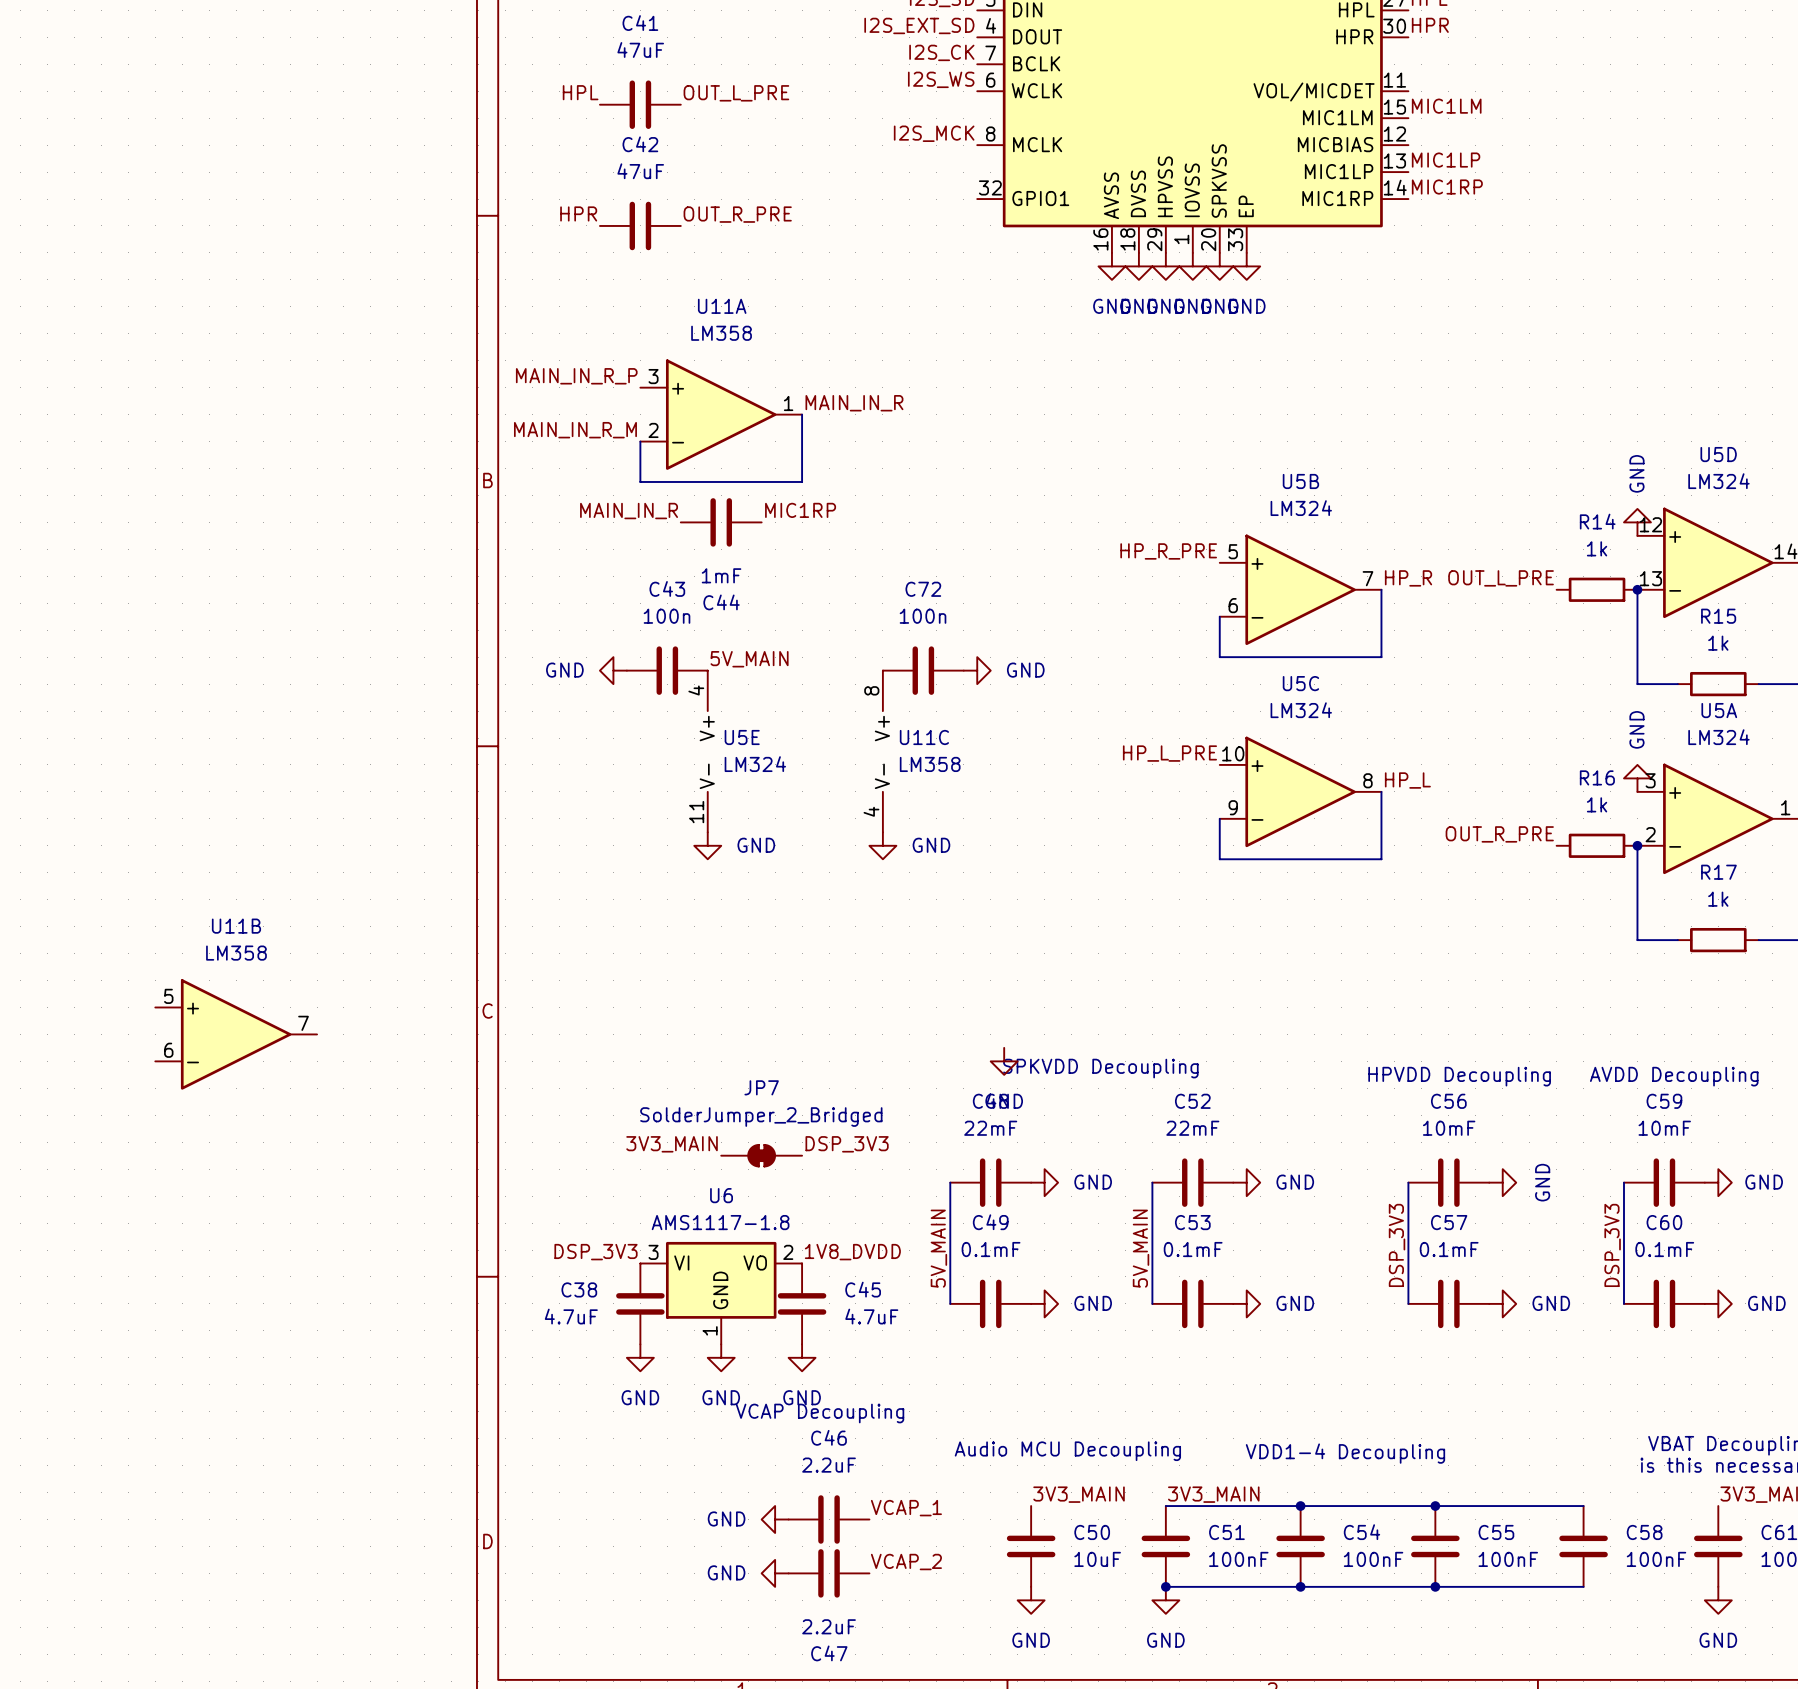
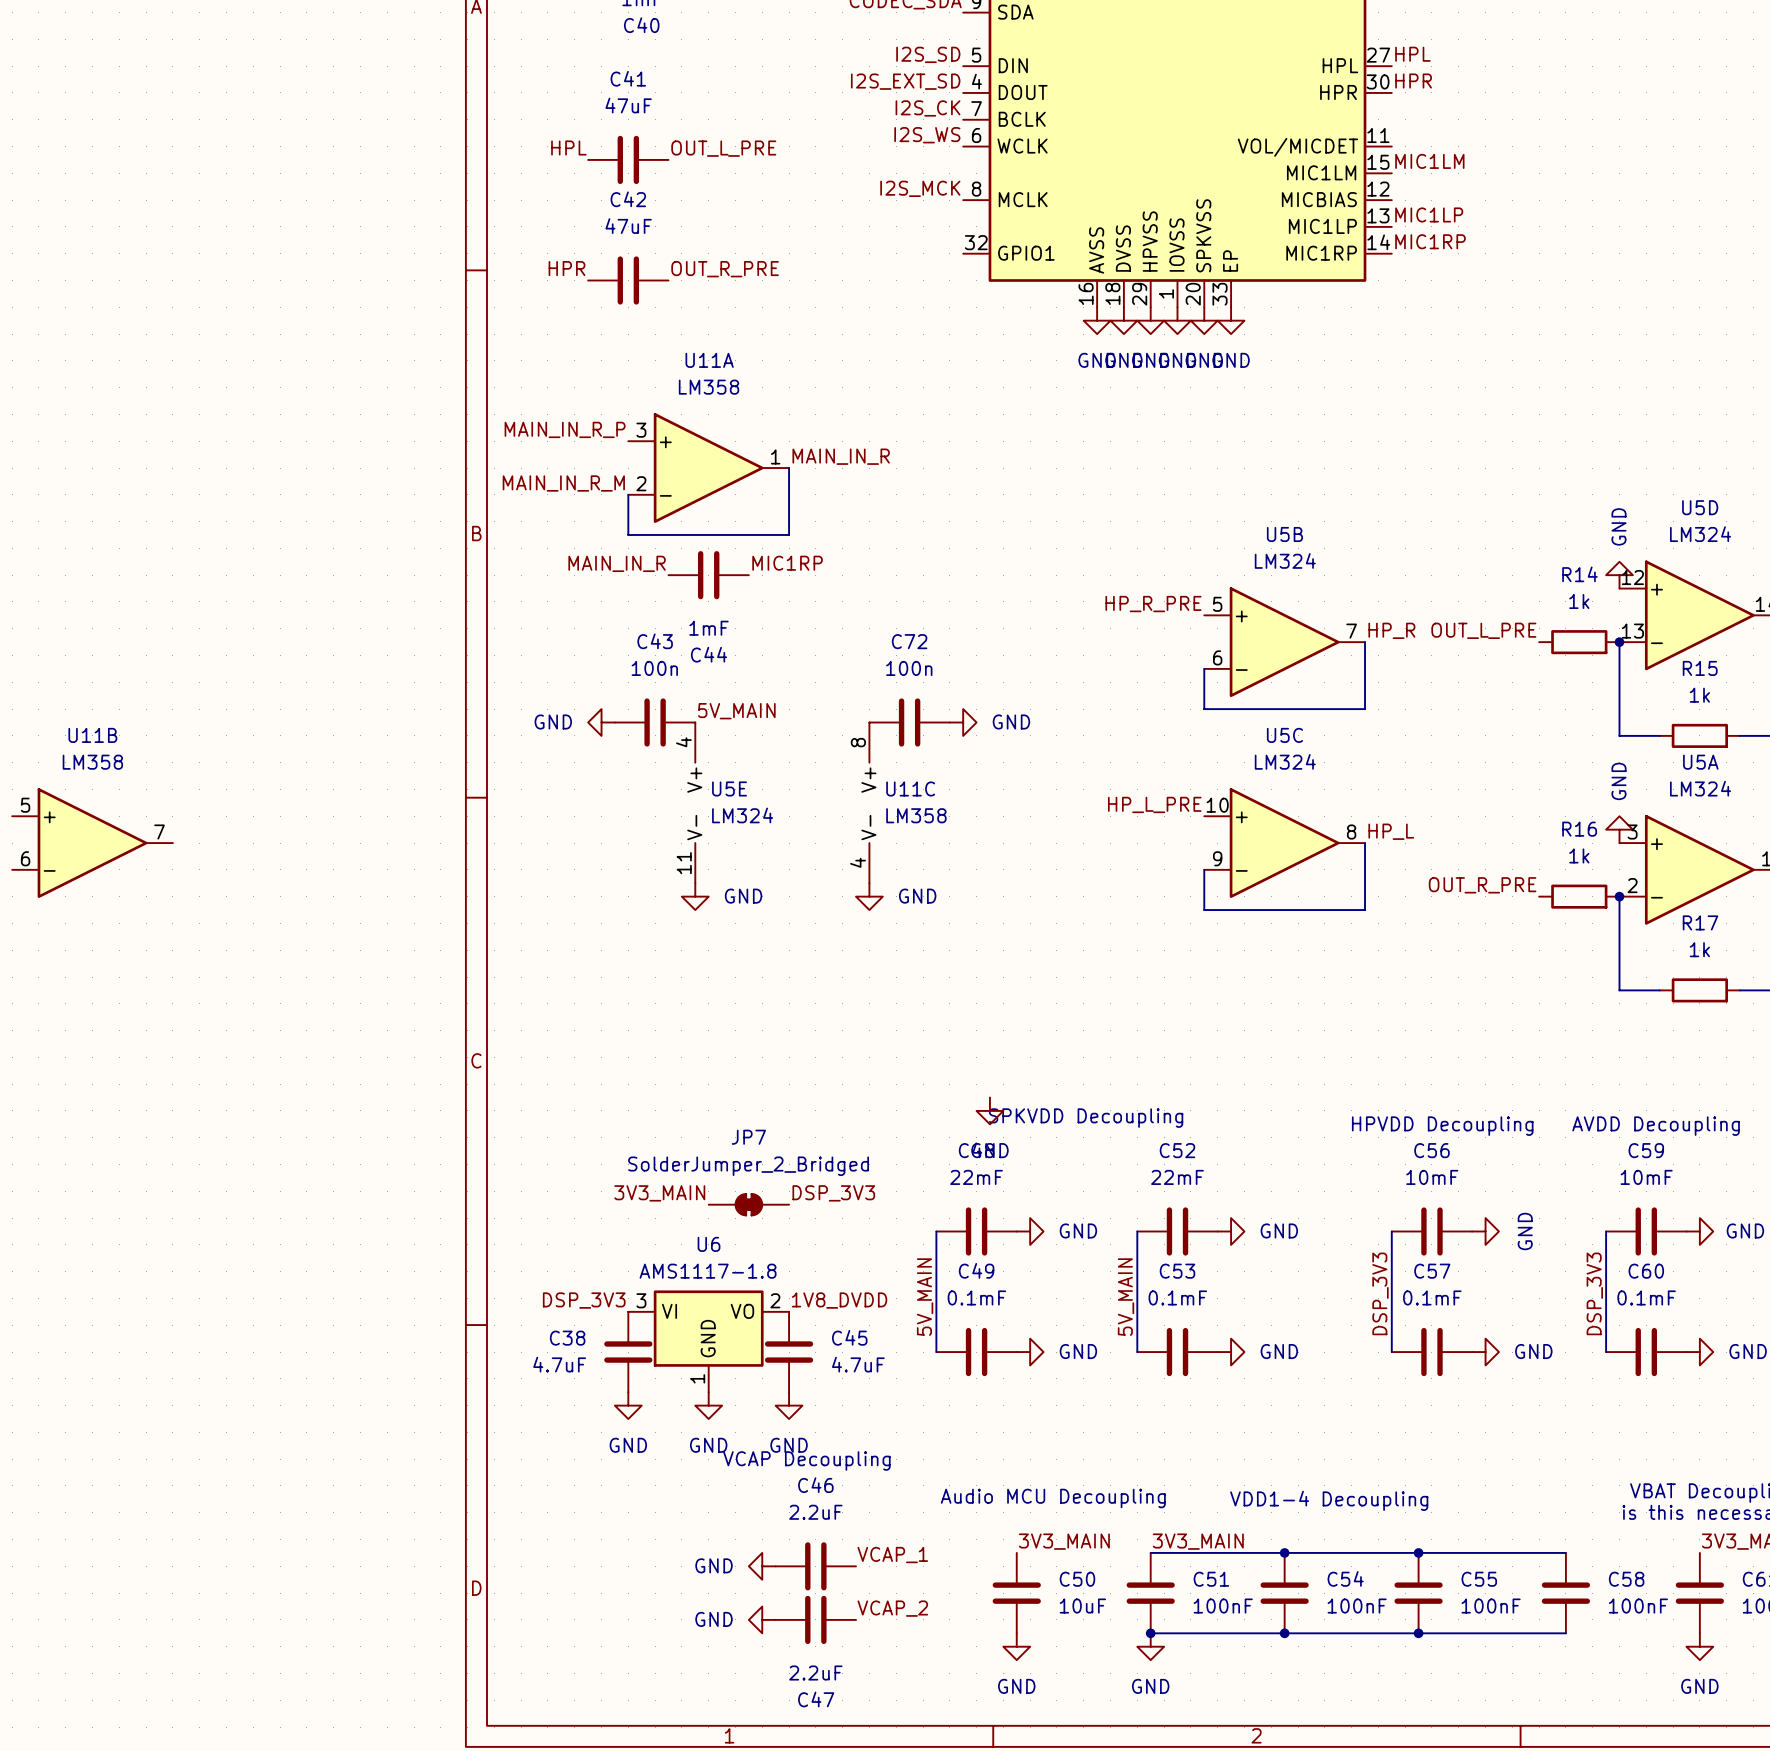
U11B position: (236, 1034) -> (92, 843)

